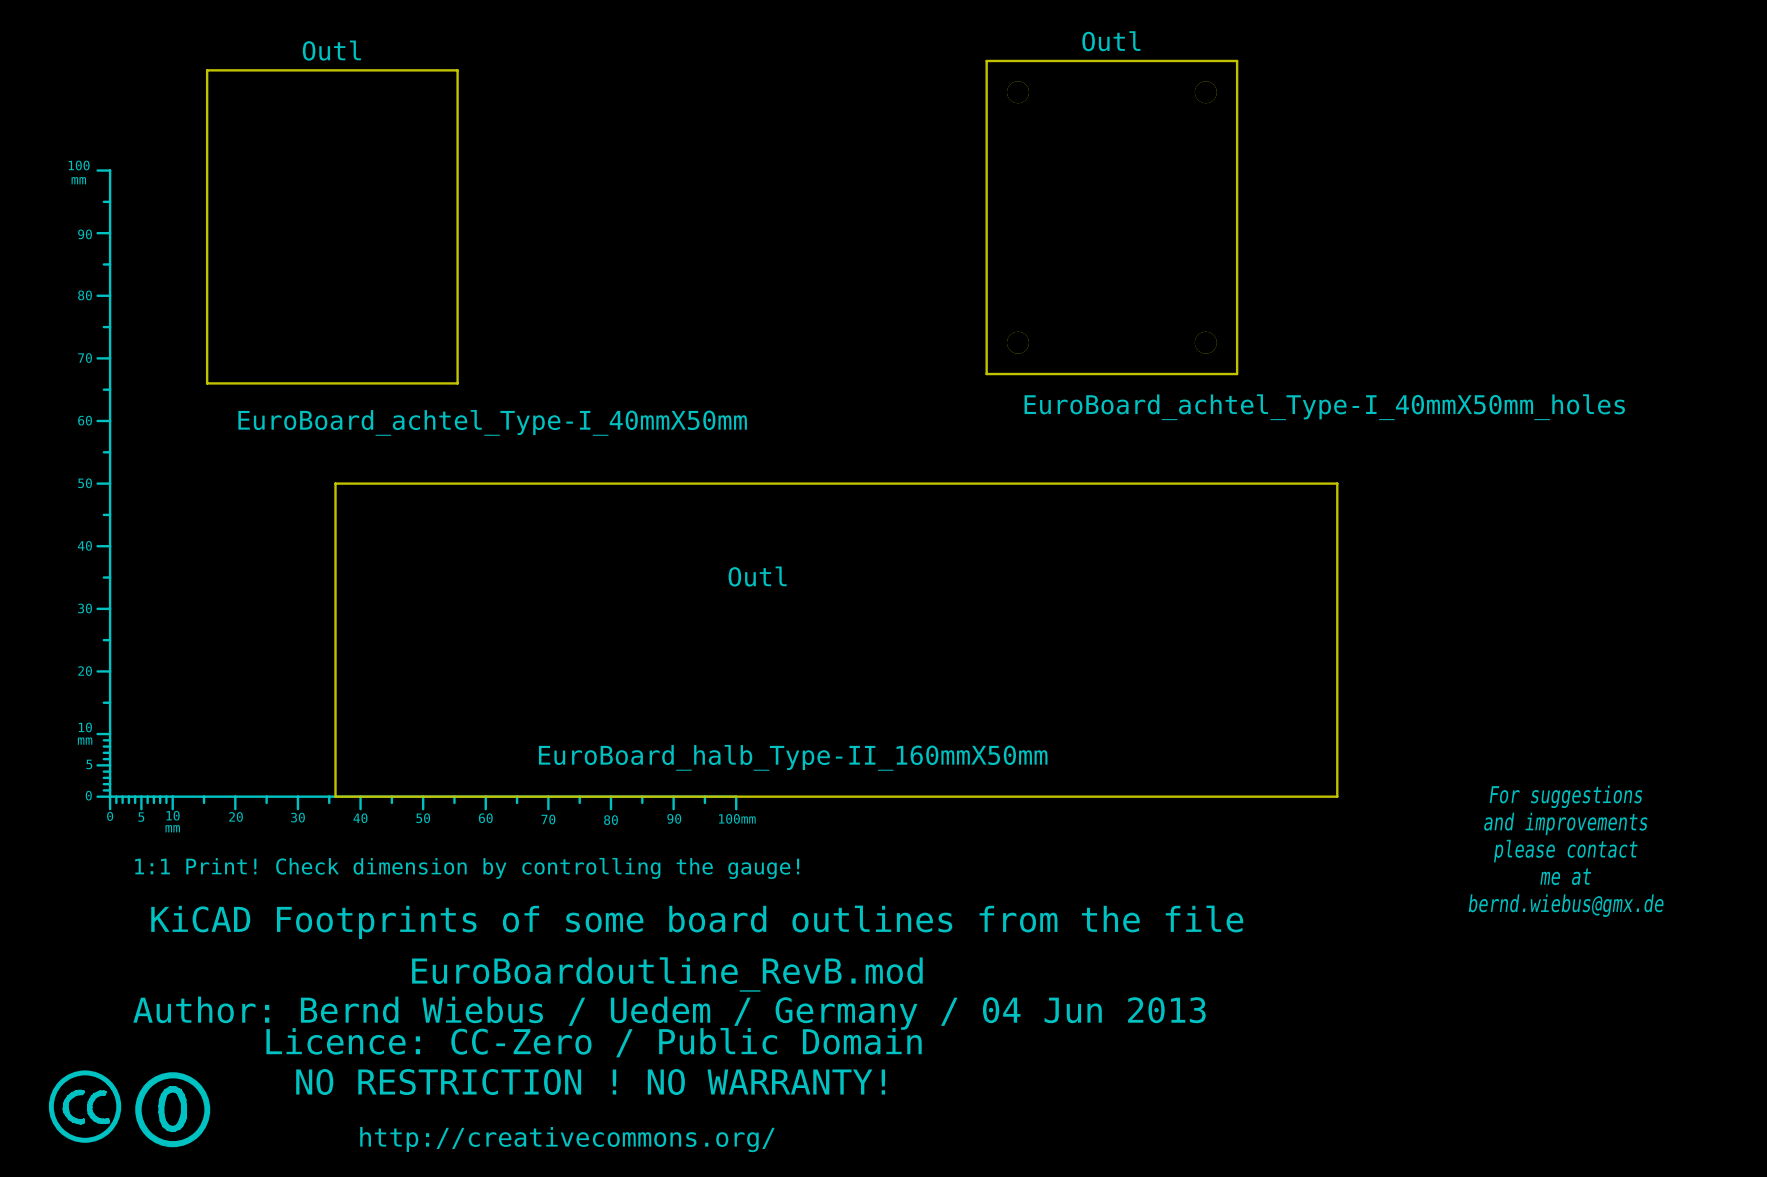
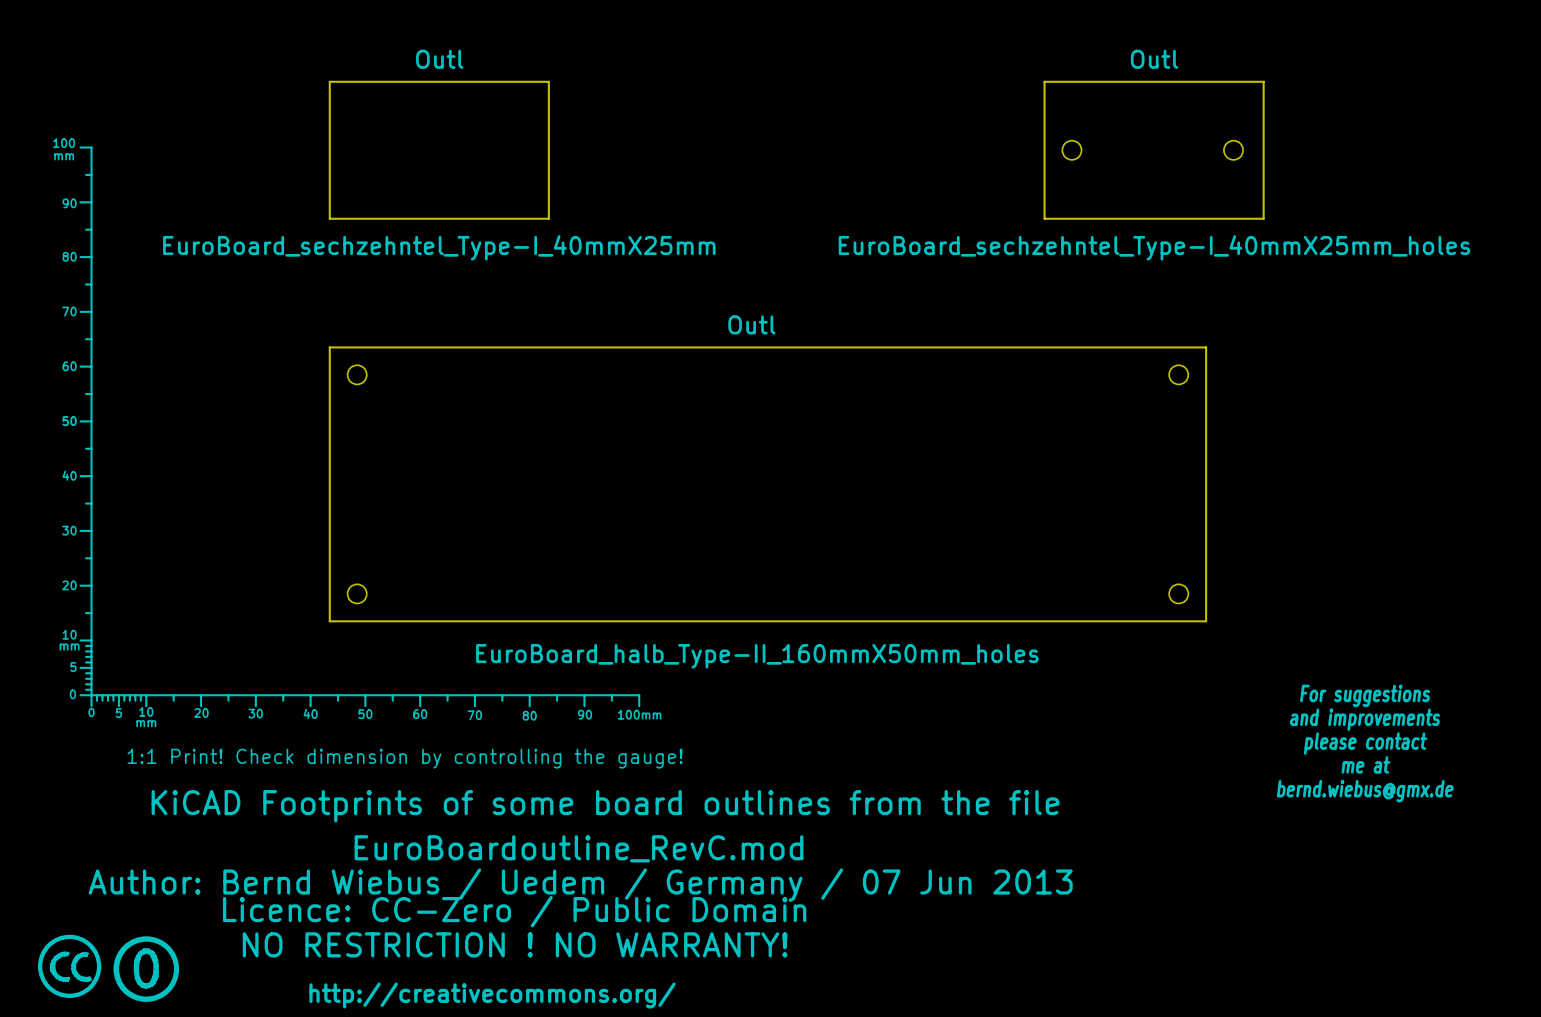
Outl: none -> EuroBoard_sechzehntel_Type-I_40mmX25mm (439, 150)
Outl: none -> EuroBoard_sechzehntel_Type-I_40mmX25mm_holes (1154, 150)
Outl: EuroBoard_achtel_Type-I_40mmX50mm_holes (1111, 217) -> none
Outl: EuroBoard_achtel_Type-I_40mmX50mm (332, 226) -> none
Outl: none -> EuroBoard_halb_Type-II_160mmX50mm_holes (767, 484)
Outl: EuroBoard_halb_Type-II_160mmX50mm (836, 640) -> none
text: EuroBoardoutline_RevB.mod (667, 974) -> EuroBoardoutline_RevC.mod (578, 848)
text: Author: Bernd Wiebus / Uedem / Germany / 04 Jun 2013 (669, 1013) -> Author: Bernd Wiebus / Uedem / Germany / 07 Jun 2013 (580, 885)

